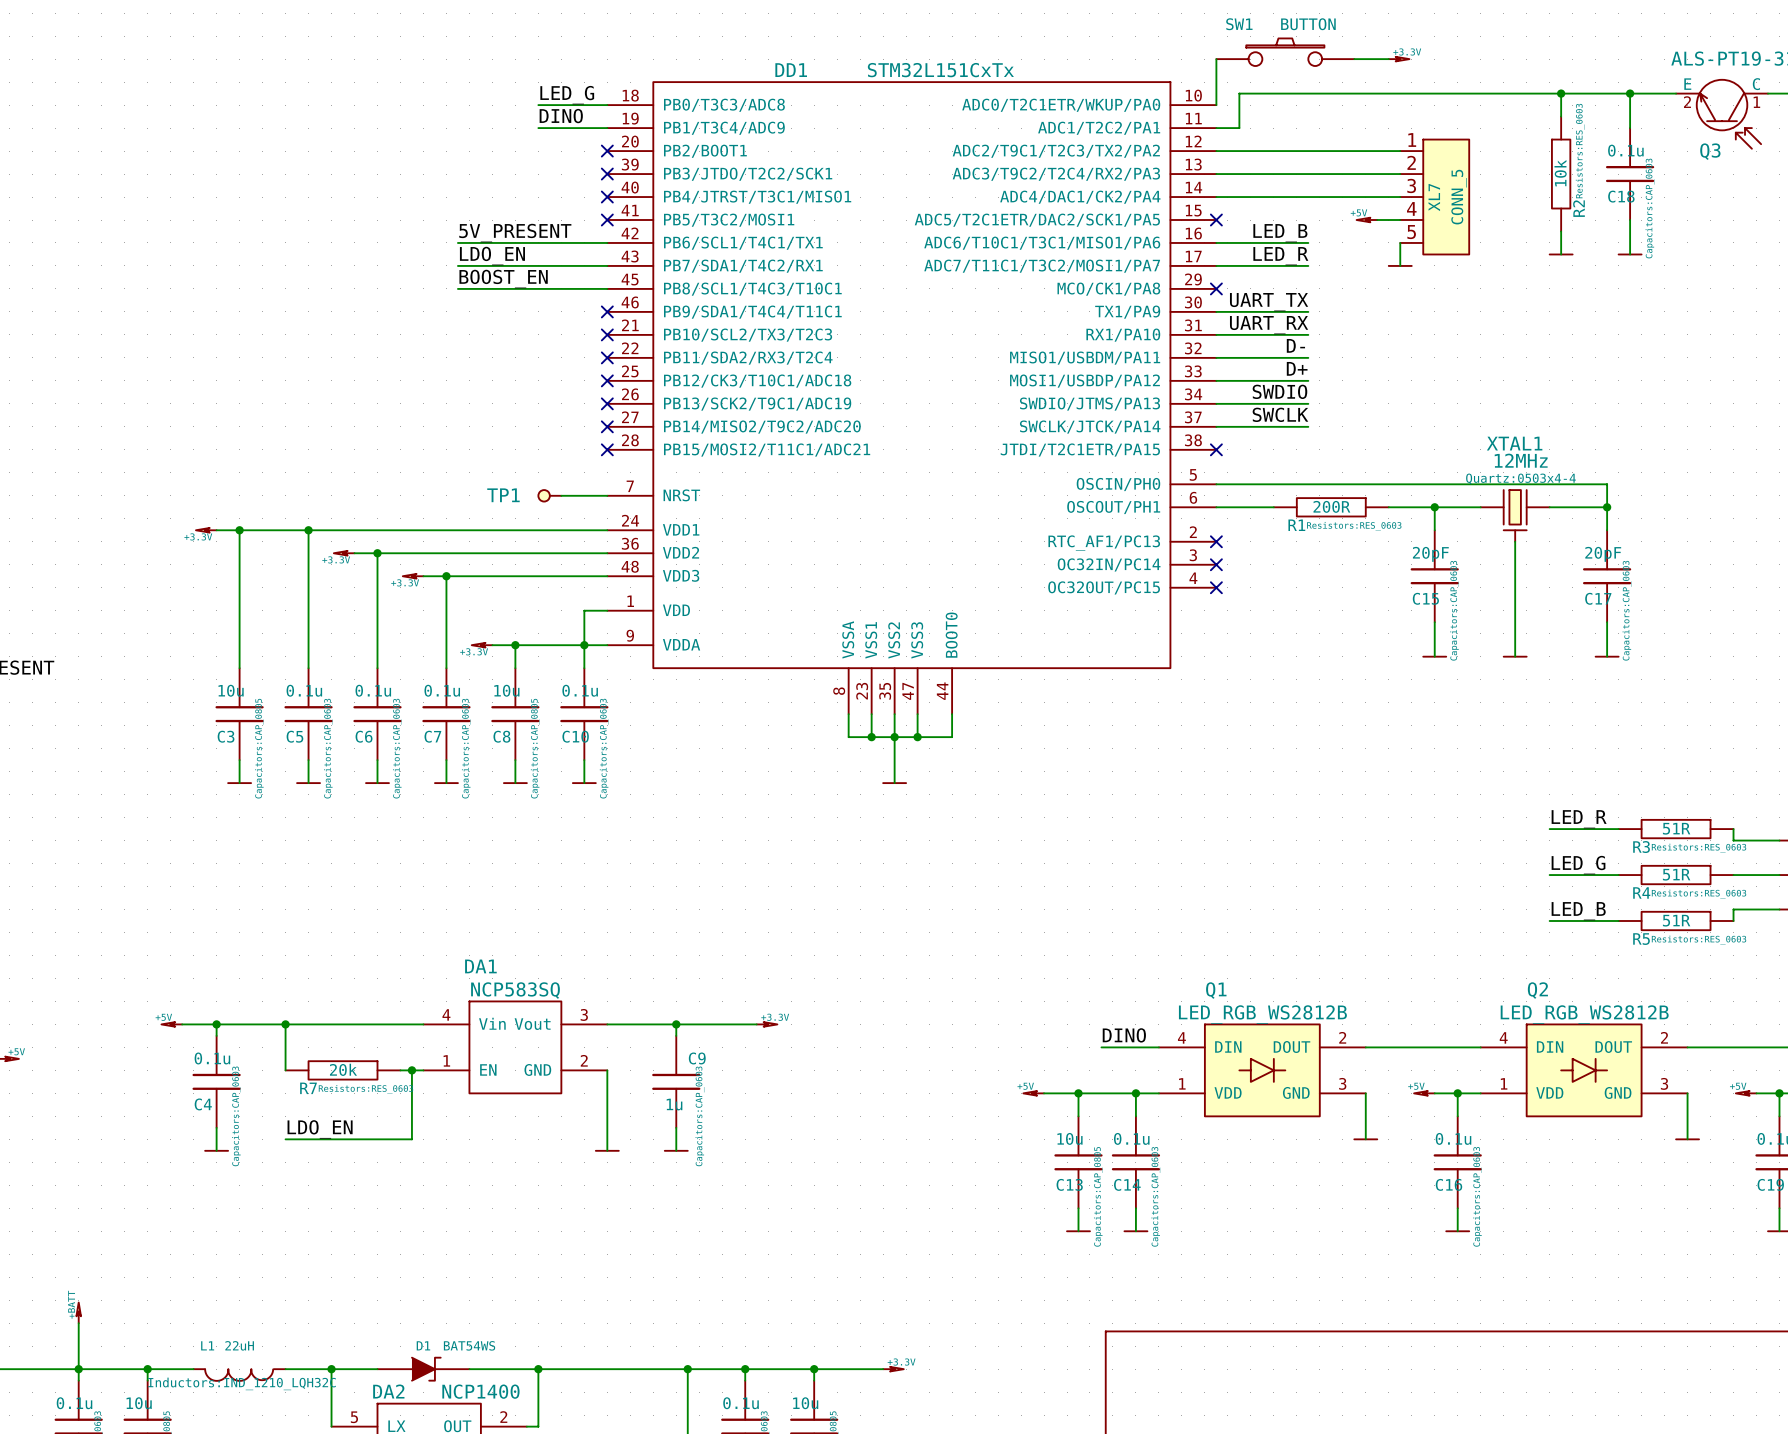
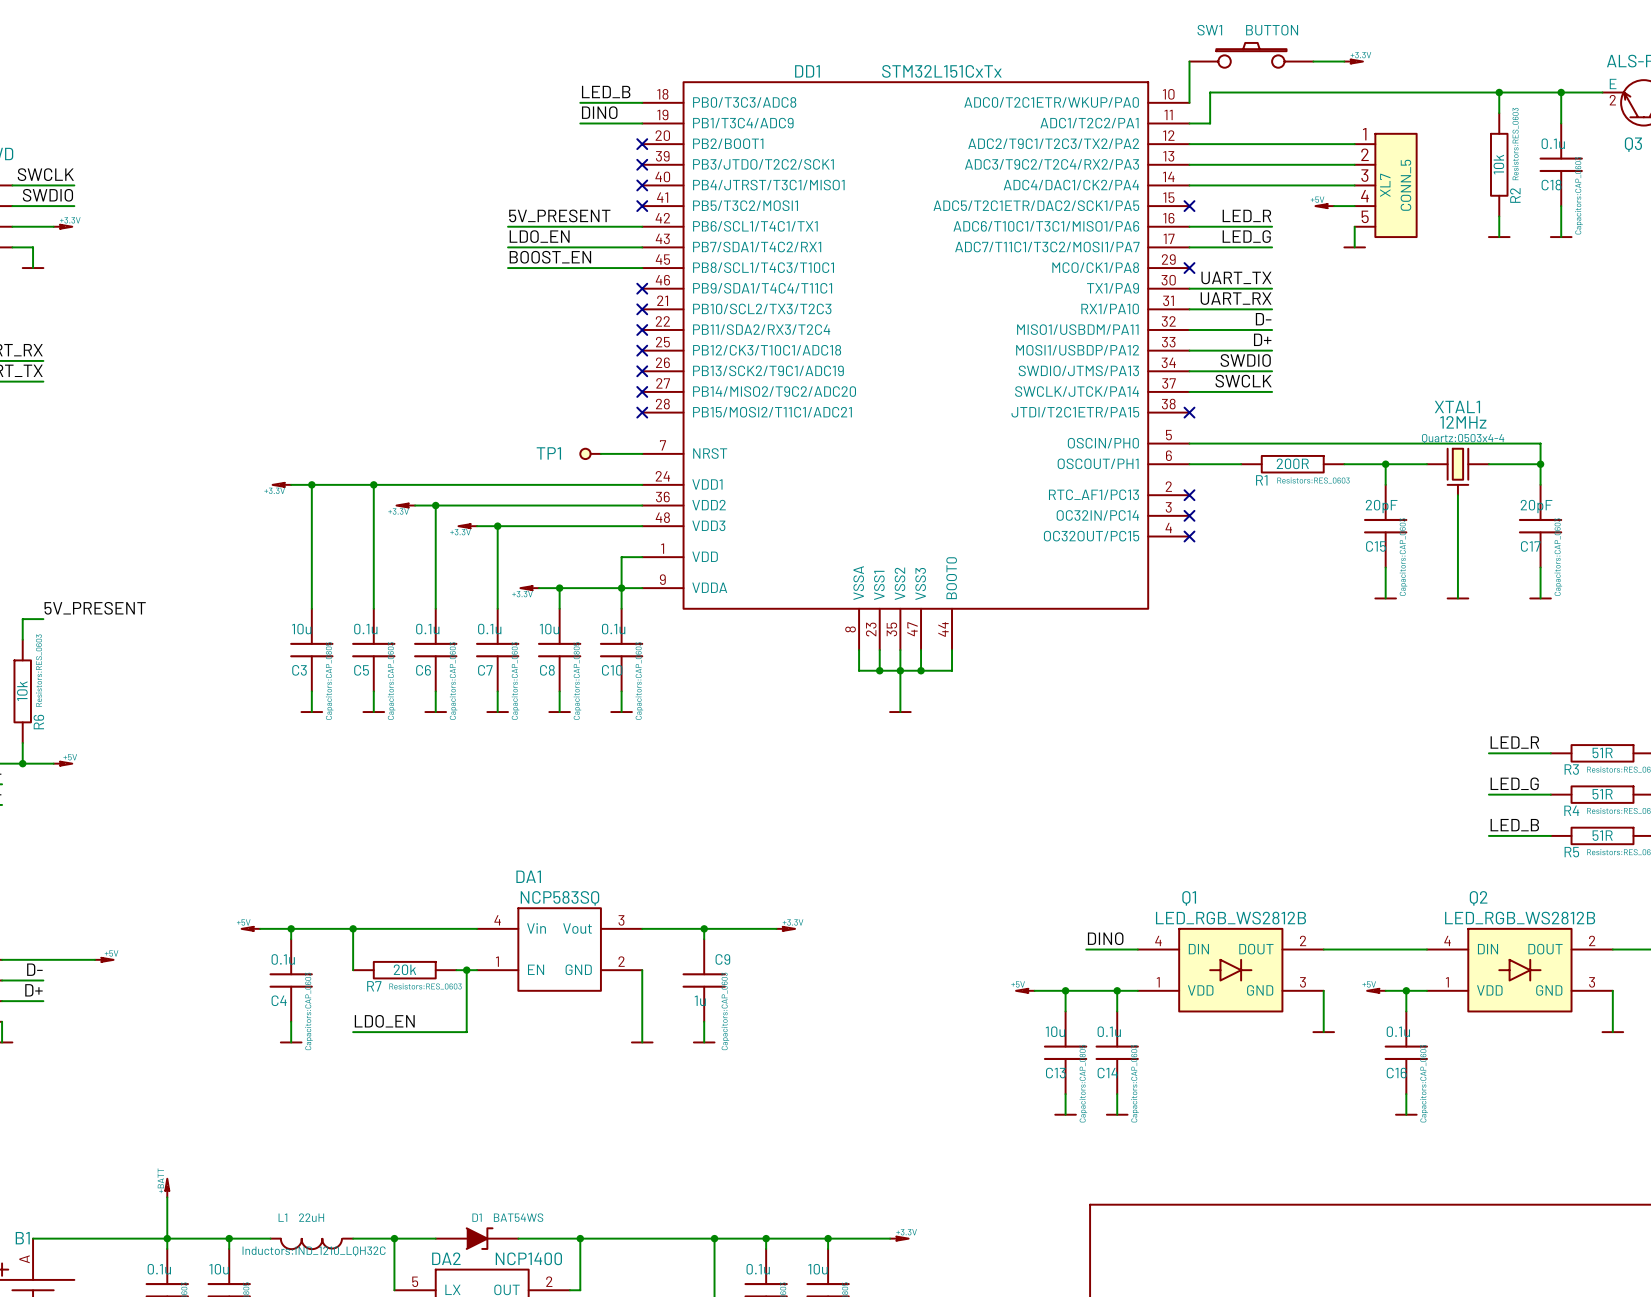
label: LED_G (567, 95) -> LED_B (606, 92)
label: LED_B (1280, 233) -> LED_R (1246, 215)
label: LED_R (1280, 256) -> LED_G (1246, 236)

